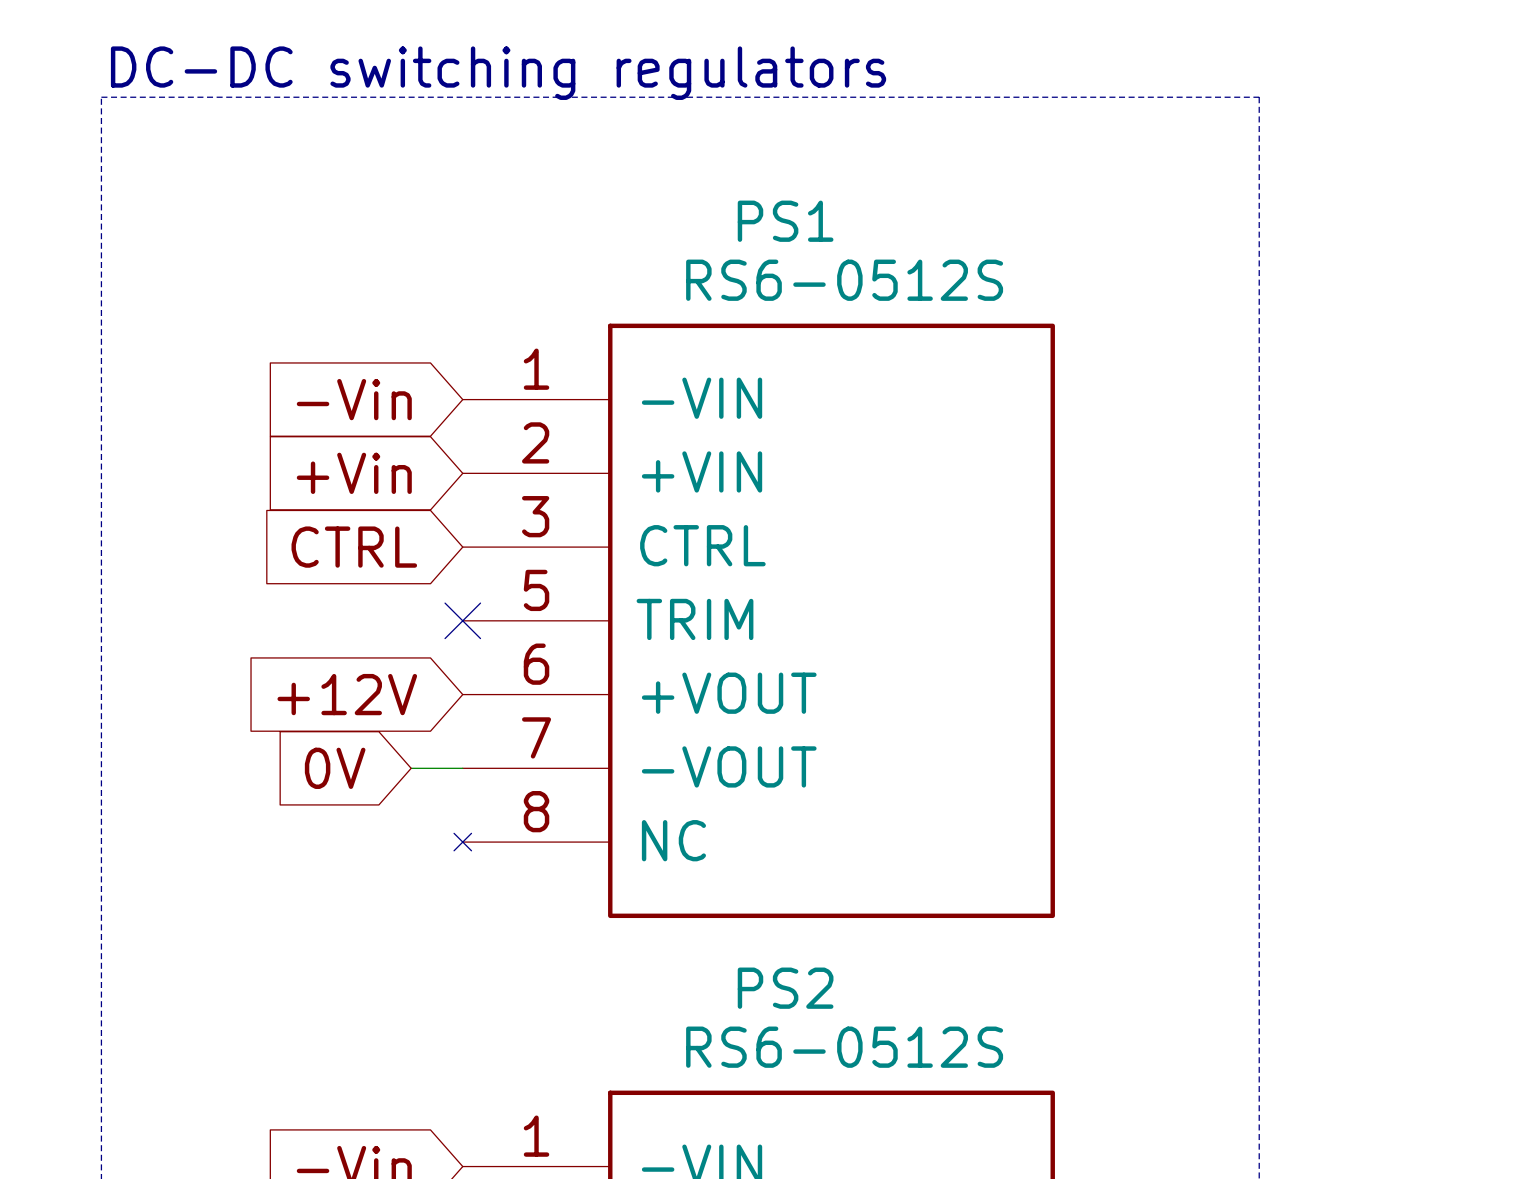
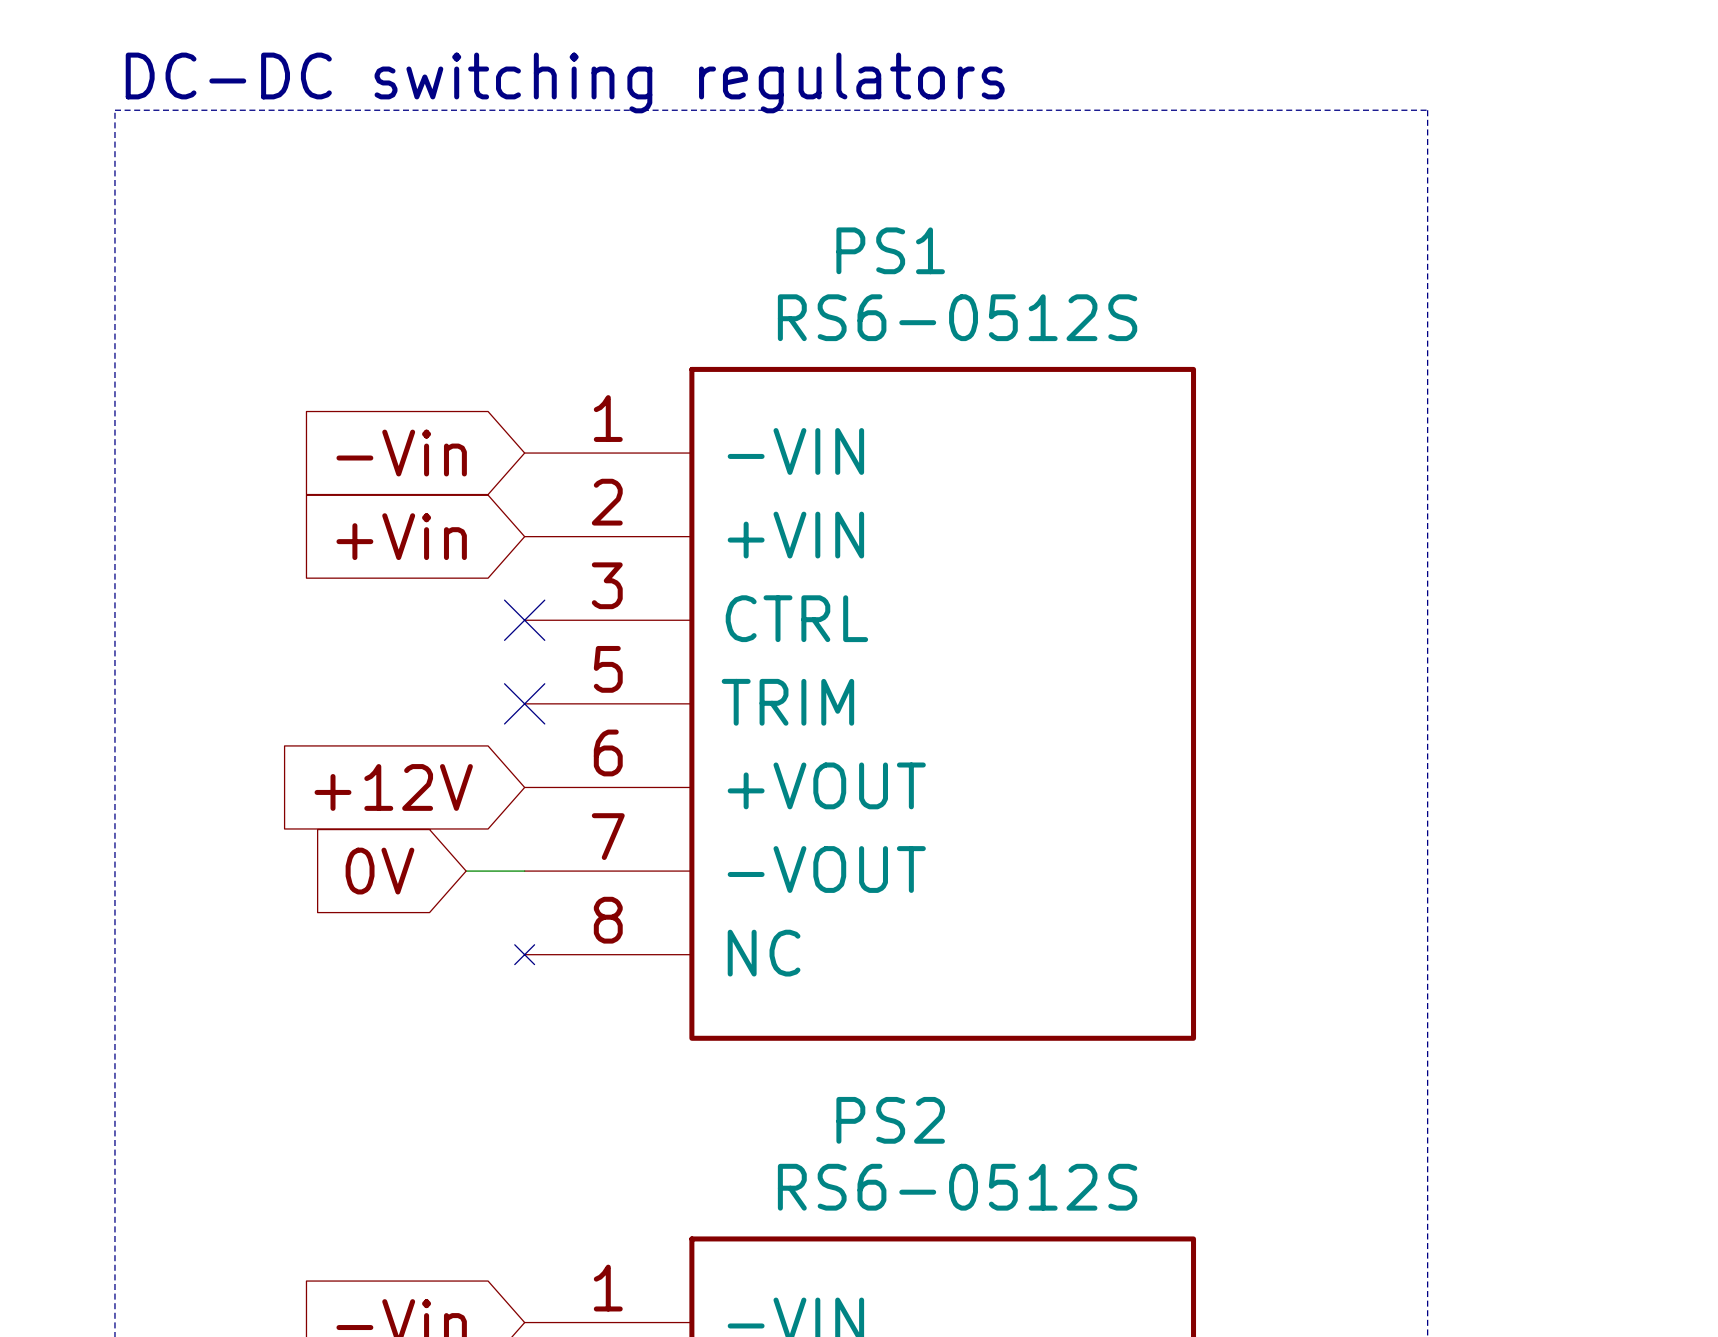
global label: CTRL (354, 547) -> none
no-connect mark: none -> (524, 620)

